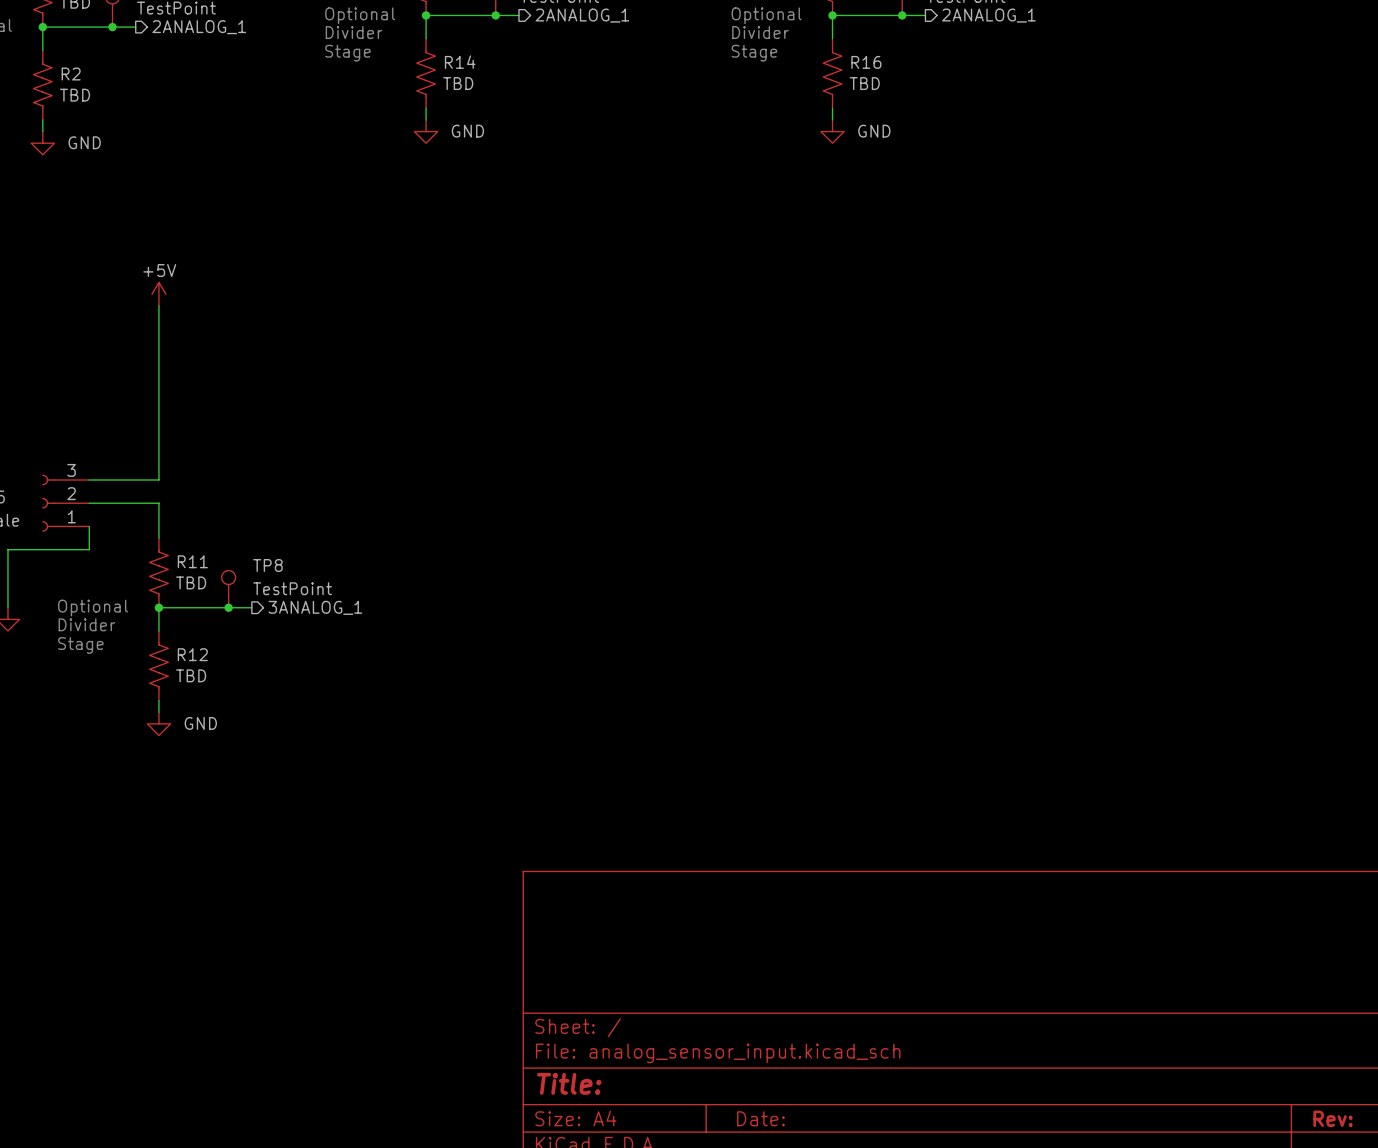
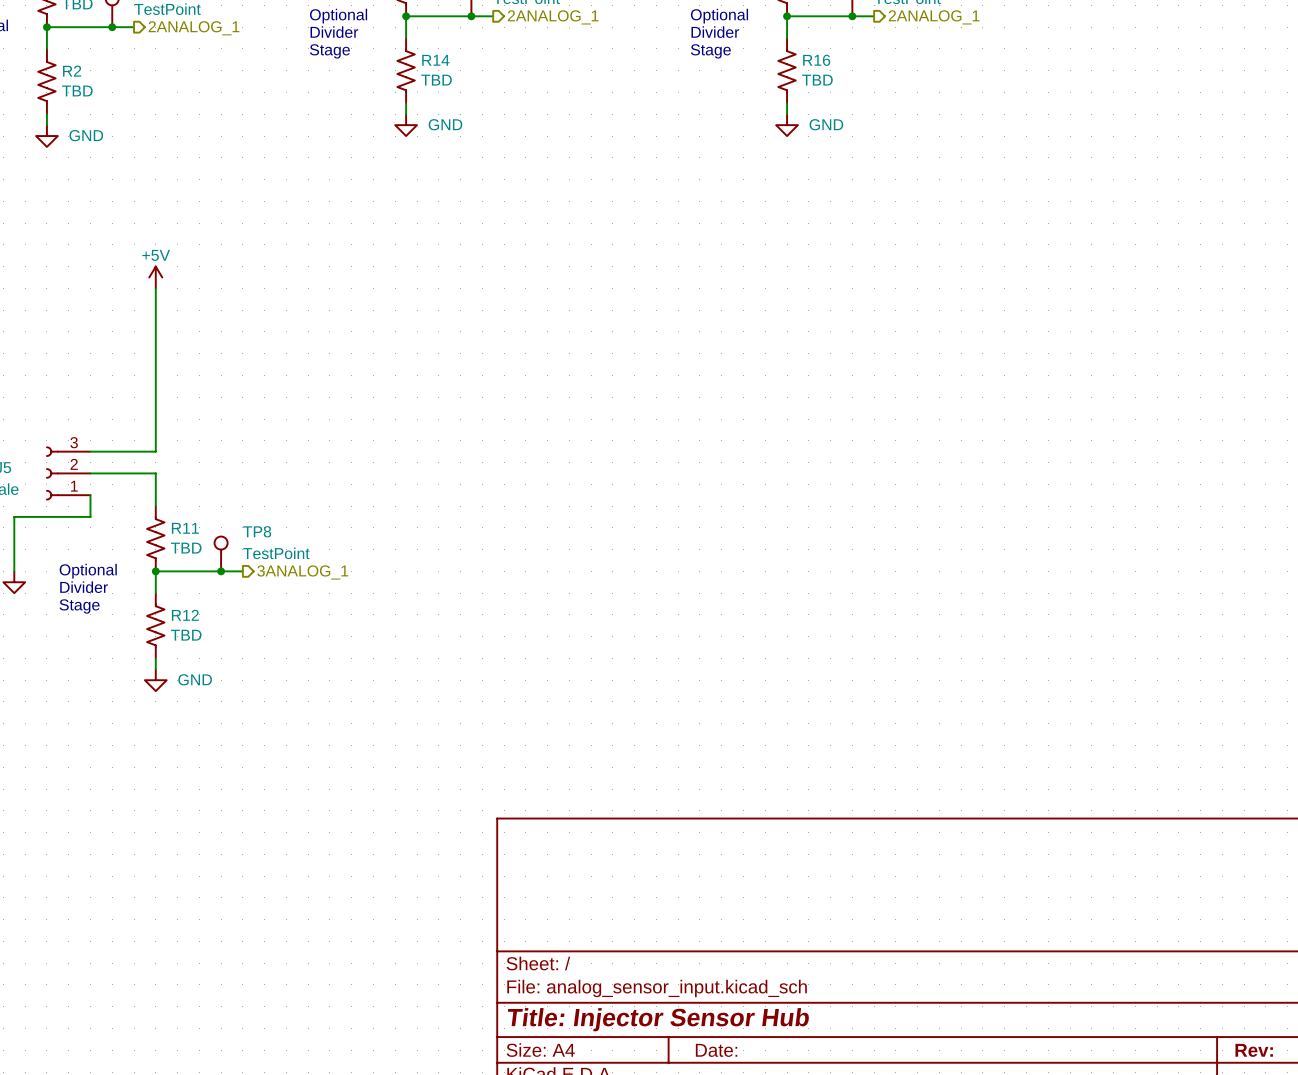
title block: Title: (569, 1083) -> Title: Injector Sensor Hub (658, 1019)

